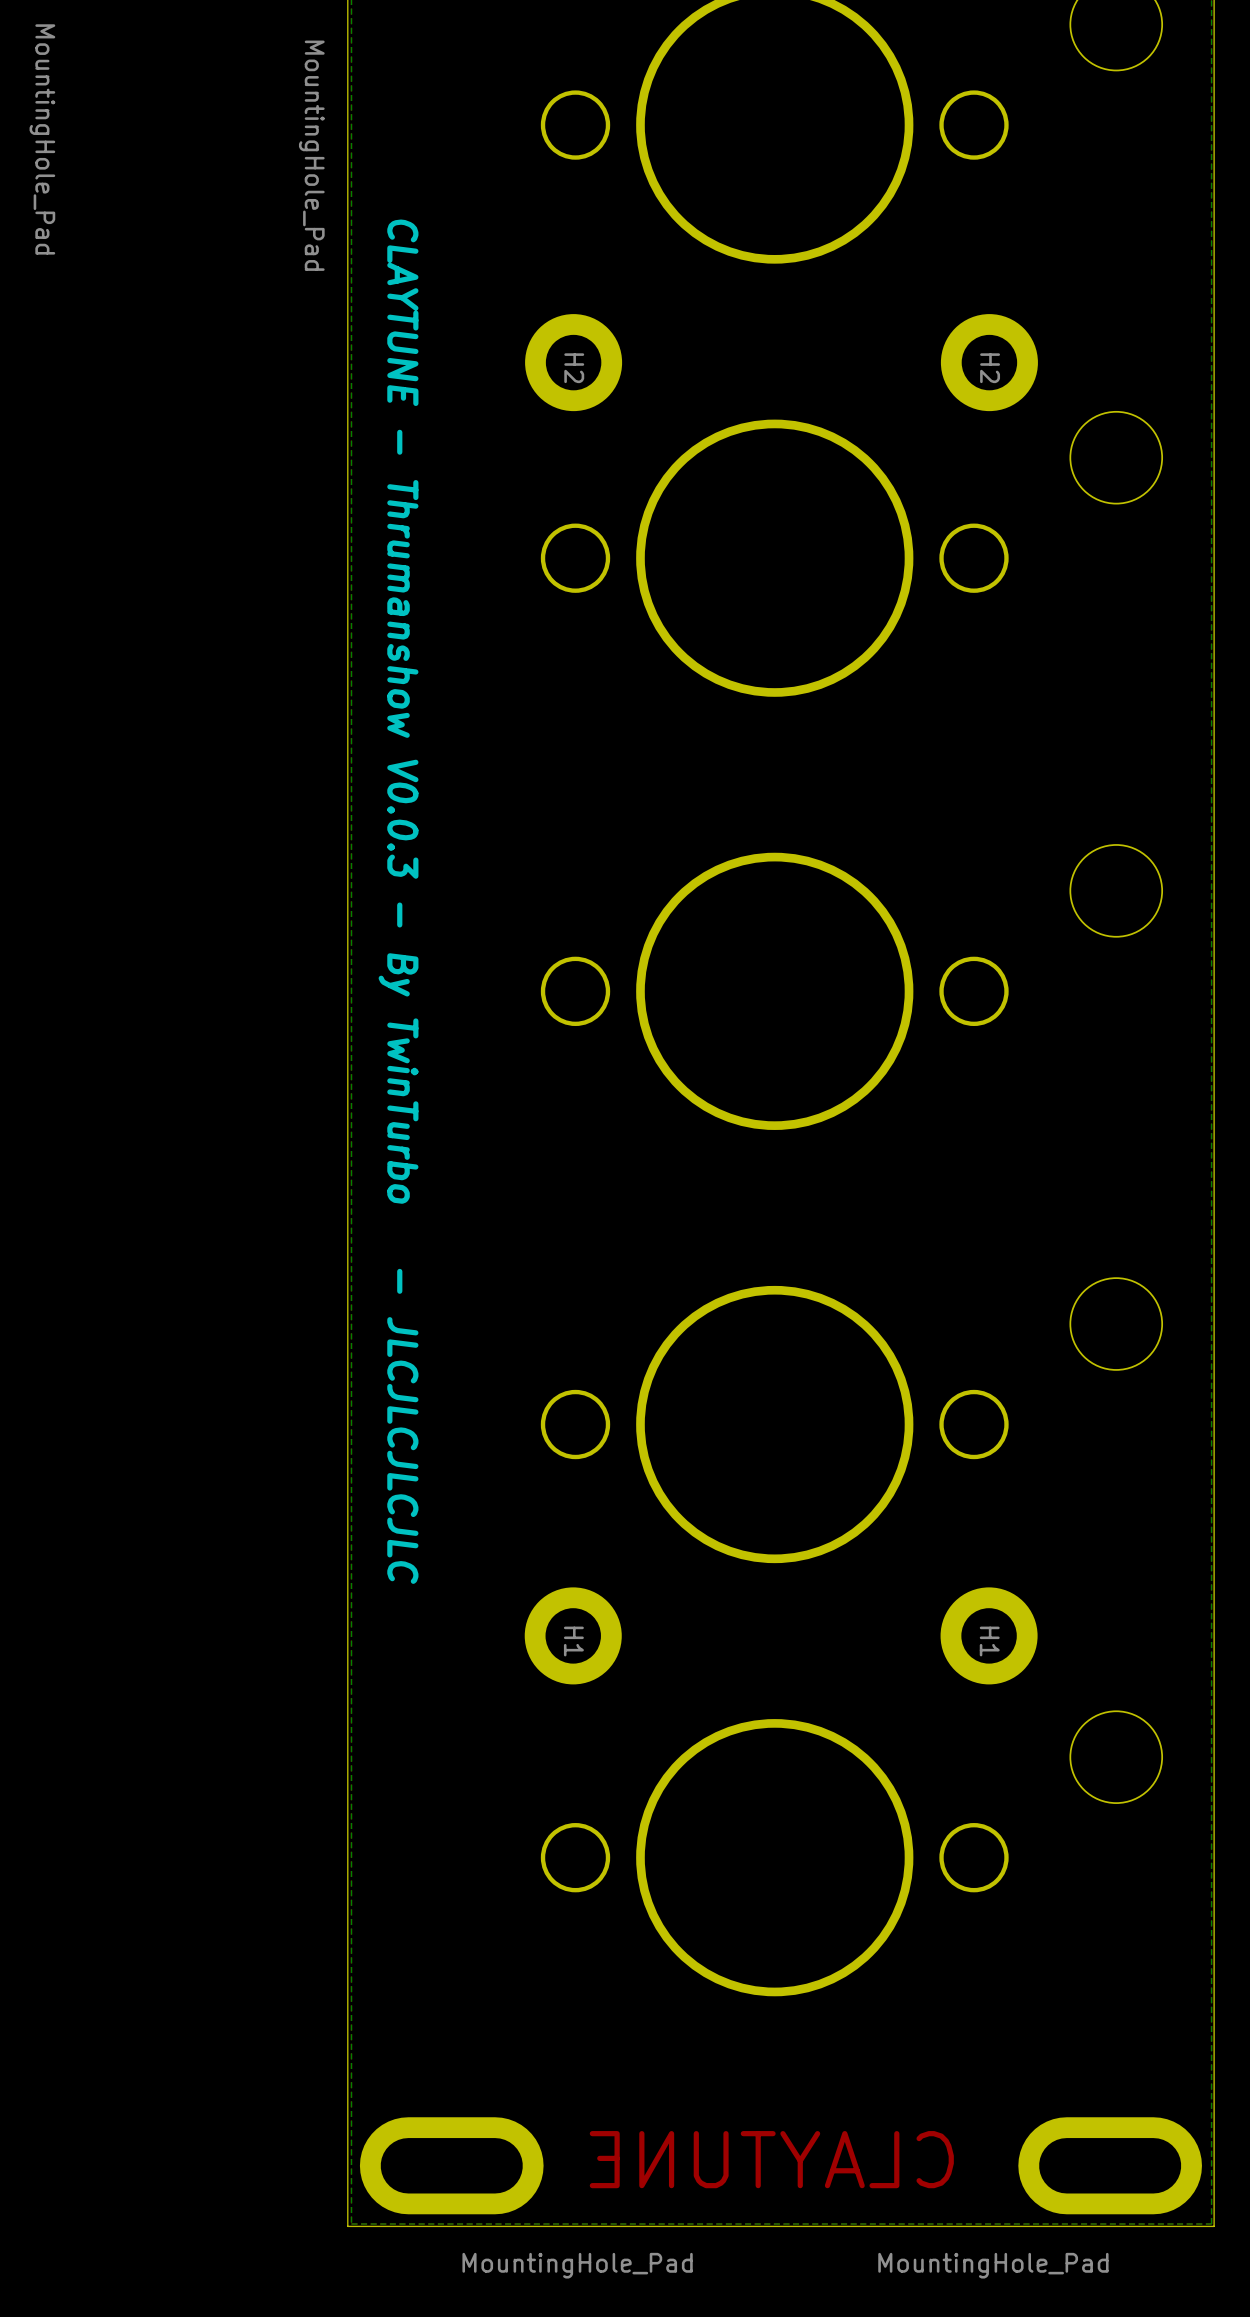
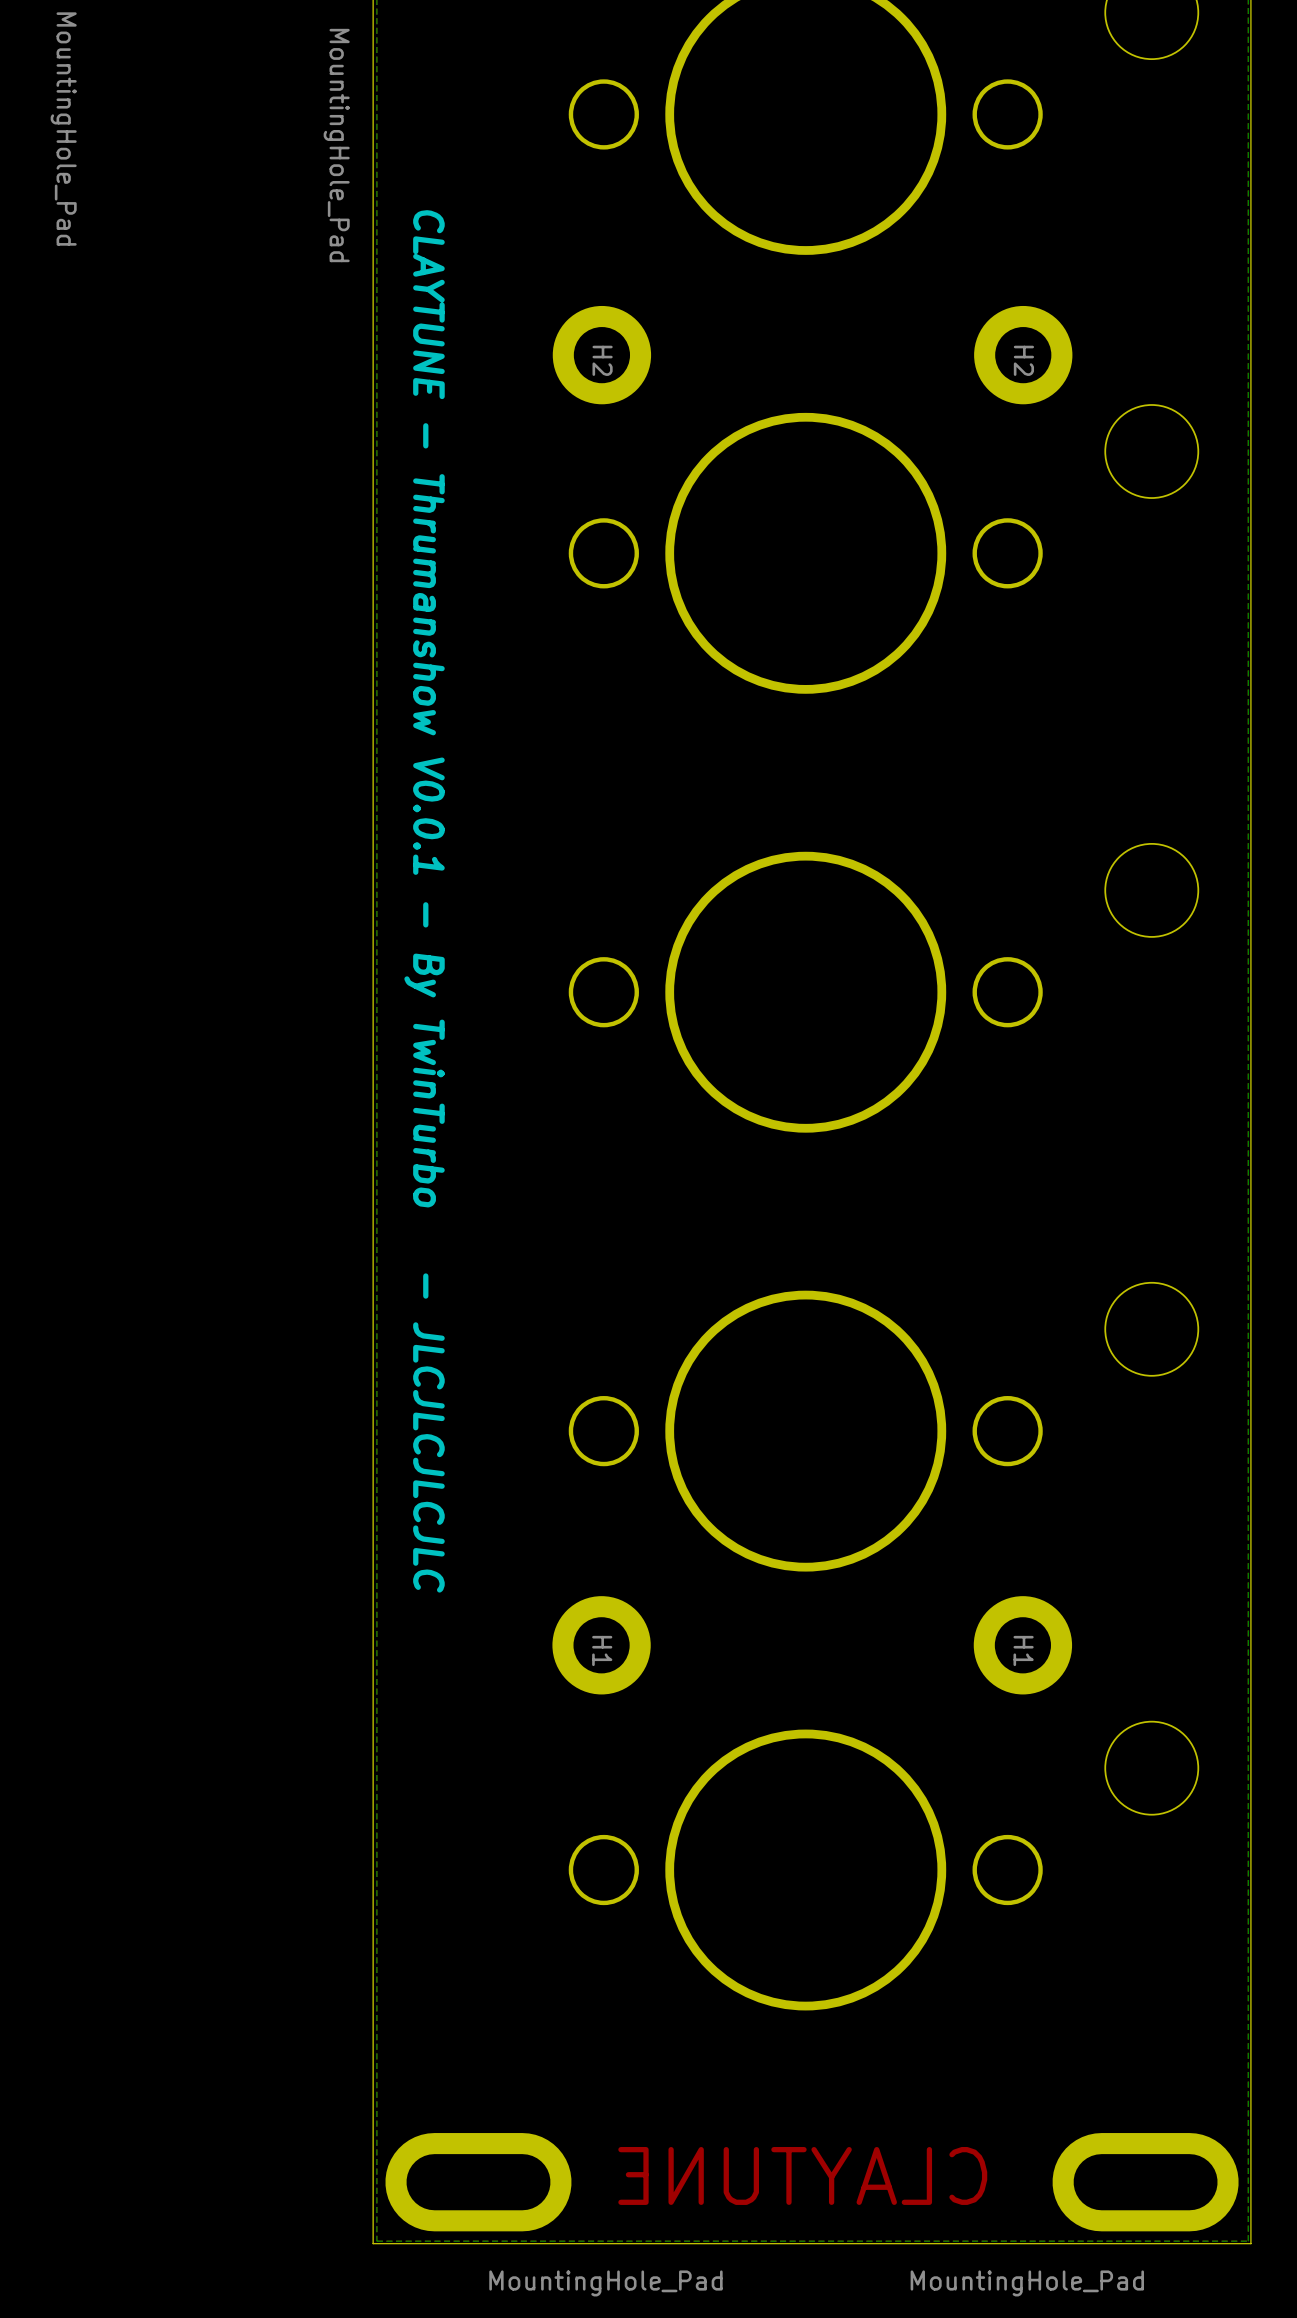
text: CLAYTUNE - Thrumanshow V0.0.3 - By TwinTurbo - JLCJLCJLCJLC (398, 901) -> CLAYTUNE - Thrumanshow V0.0.1 - By TwinTurbo - JLCJLCJLCJLC (424, 901)

